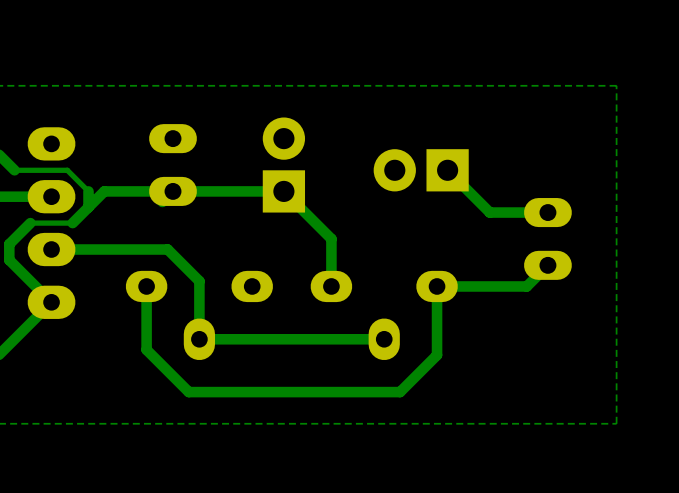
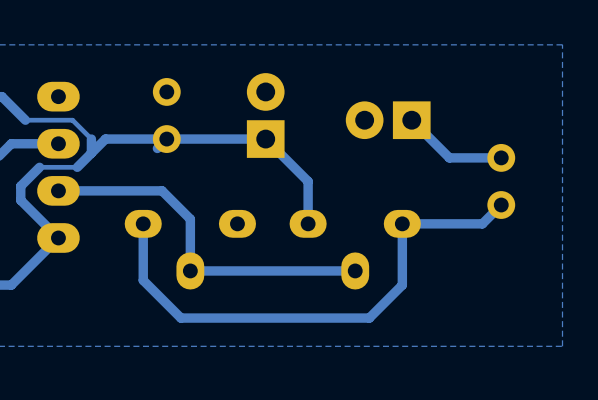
part footprint: [149, 124, 197, 206] -> [152, 78, 181, 153]
part footprint: [524, 198, 572, 280] -> [487, 143, 516, 219]

